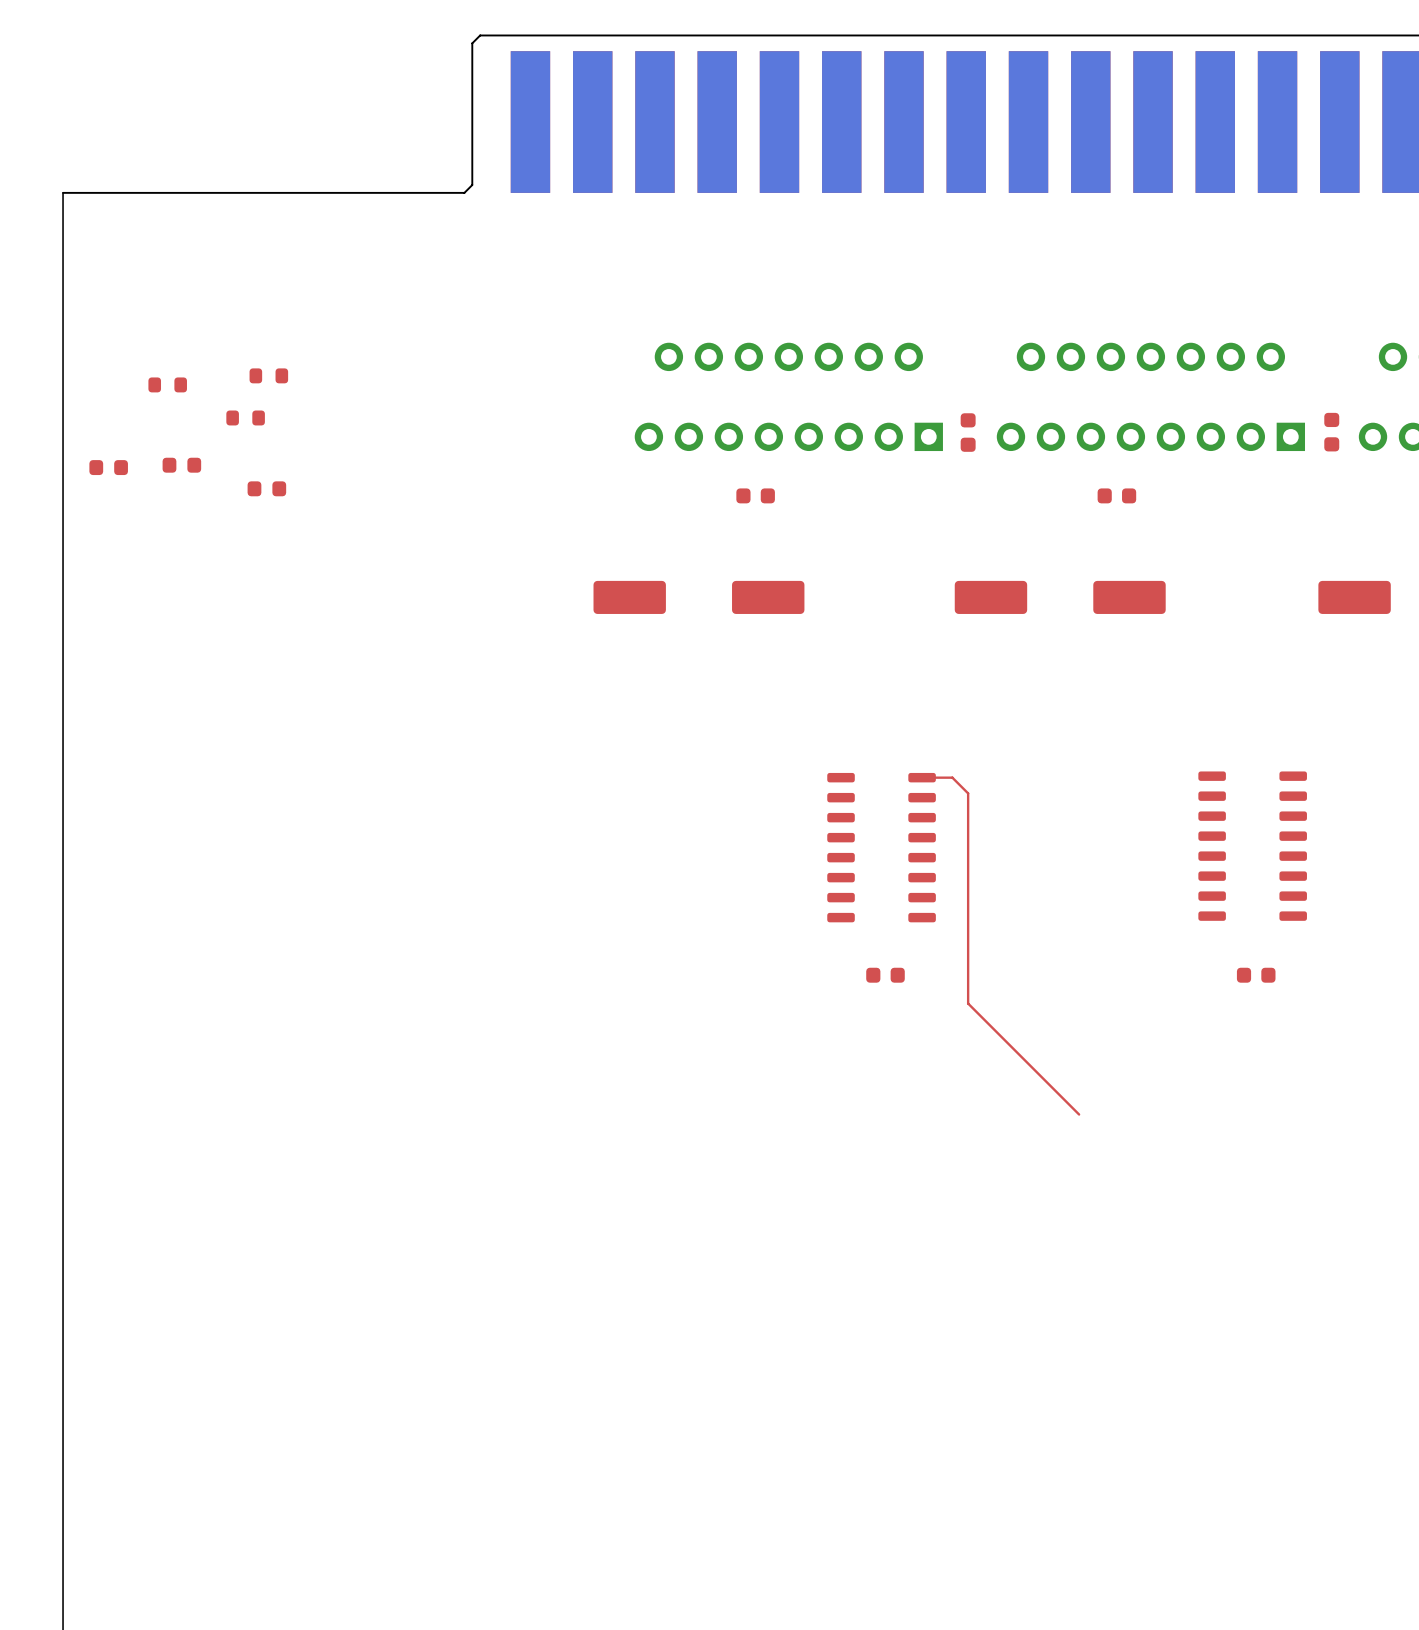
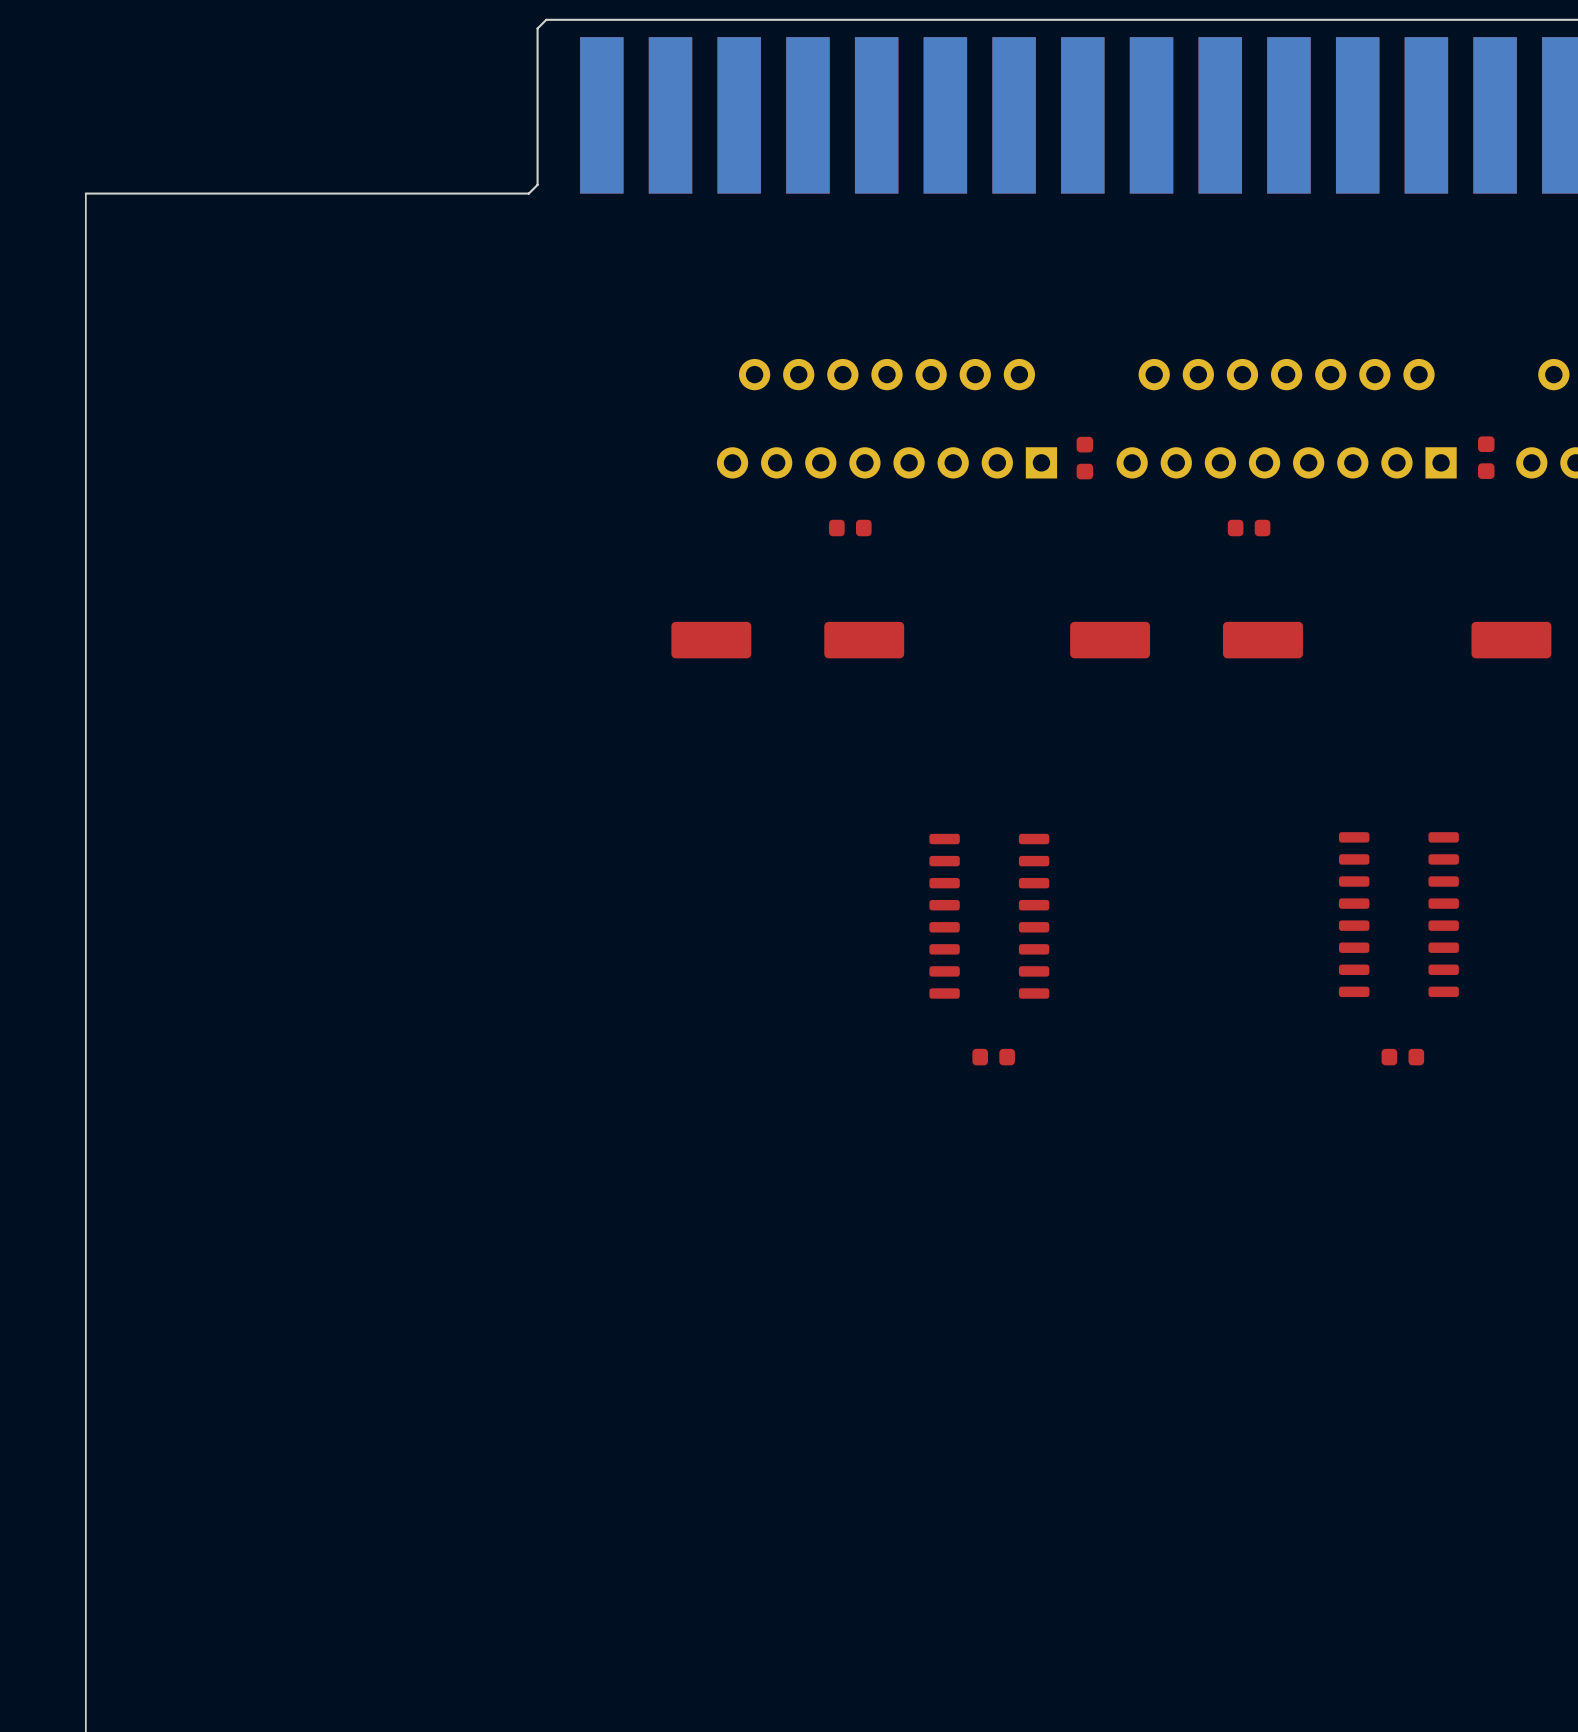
part: (268, 375) -> none
part: (167, 384) -> none
part: (245, 417) -> none
part: (181, 465) -> none
part: (108, 467) -> none
part: (266, 488) -> none
top track: (922, 777) (952, 777) (968, 793) (968, 1003) (1079, 1114) -> none

